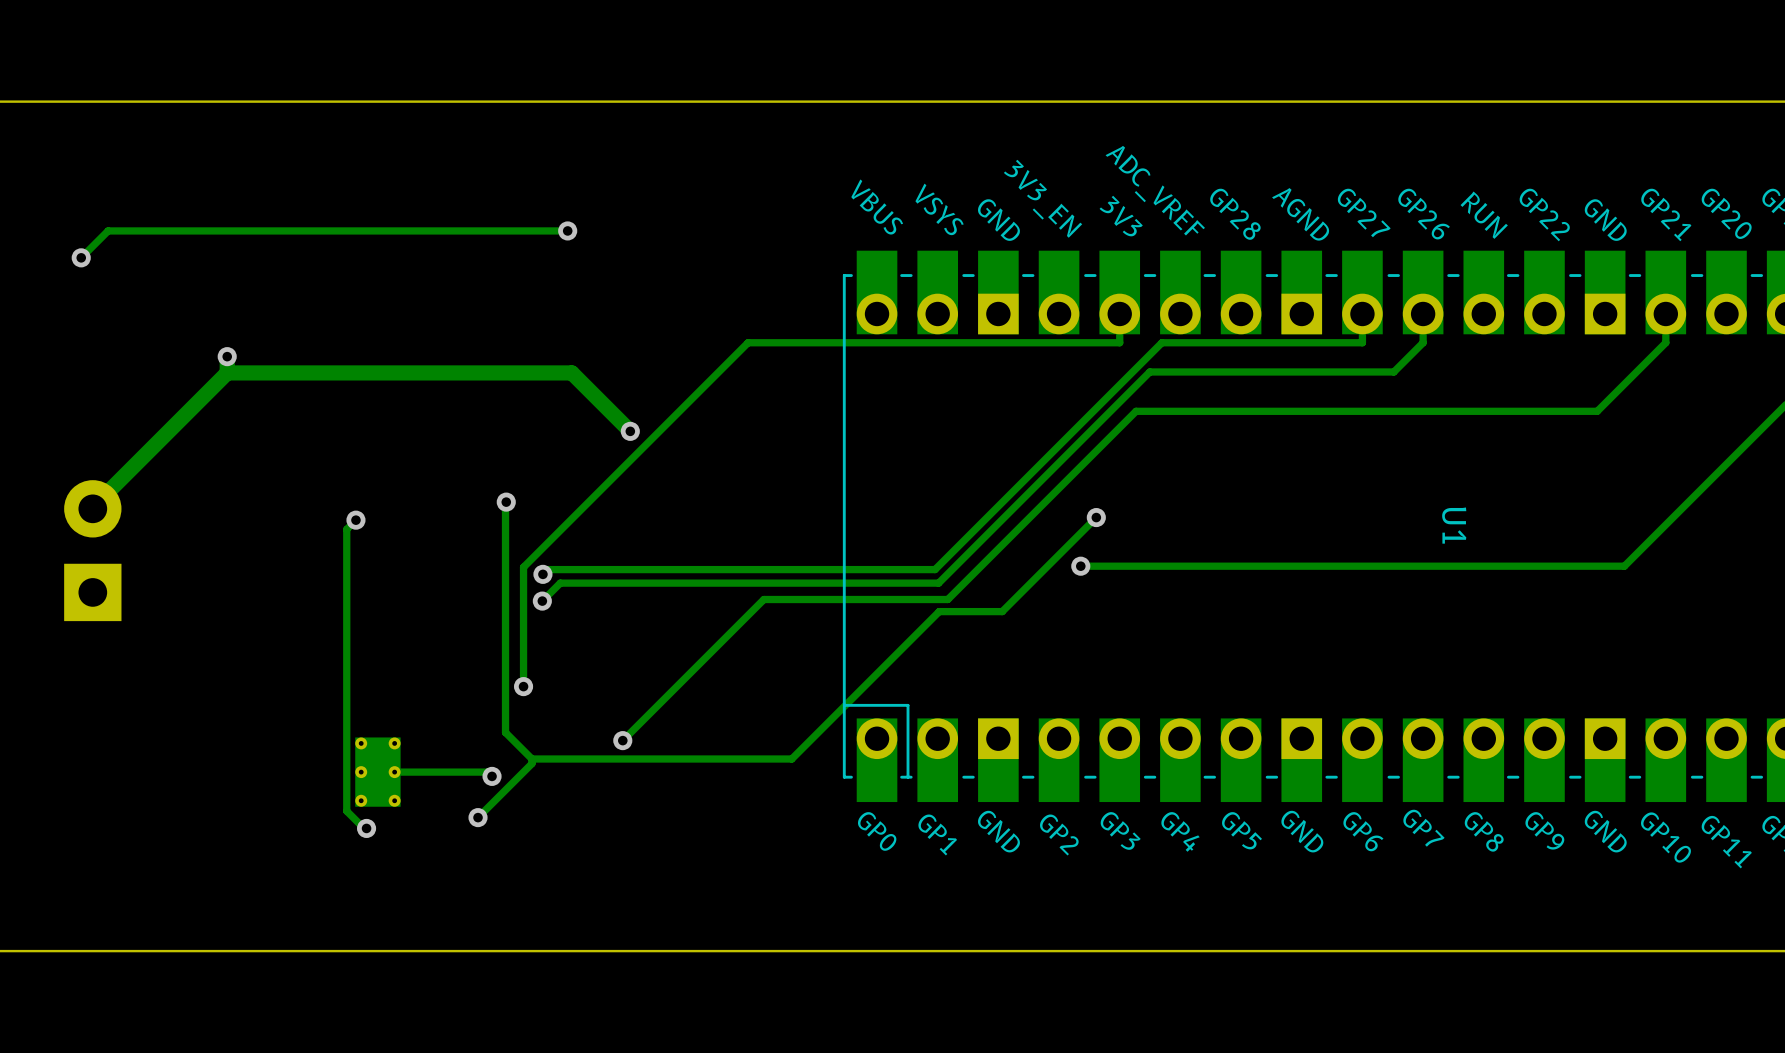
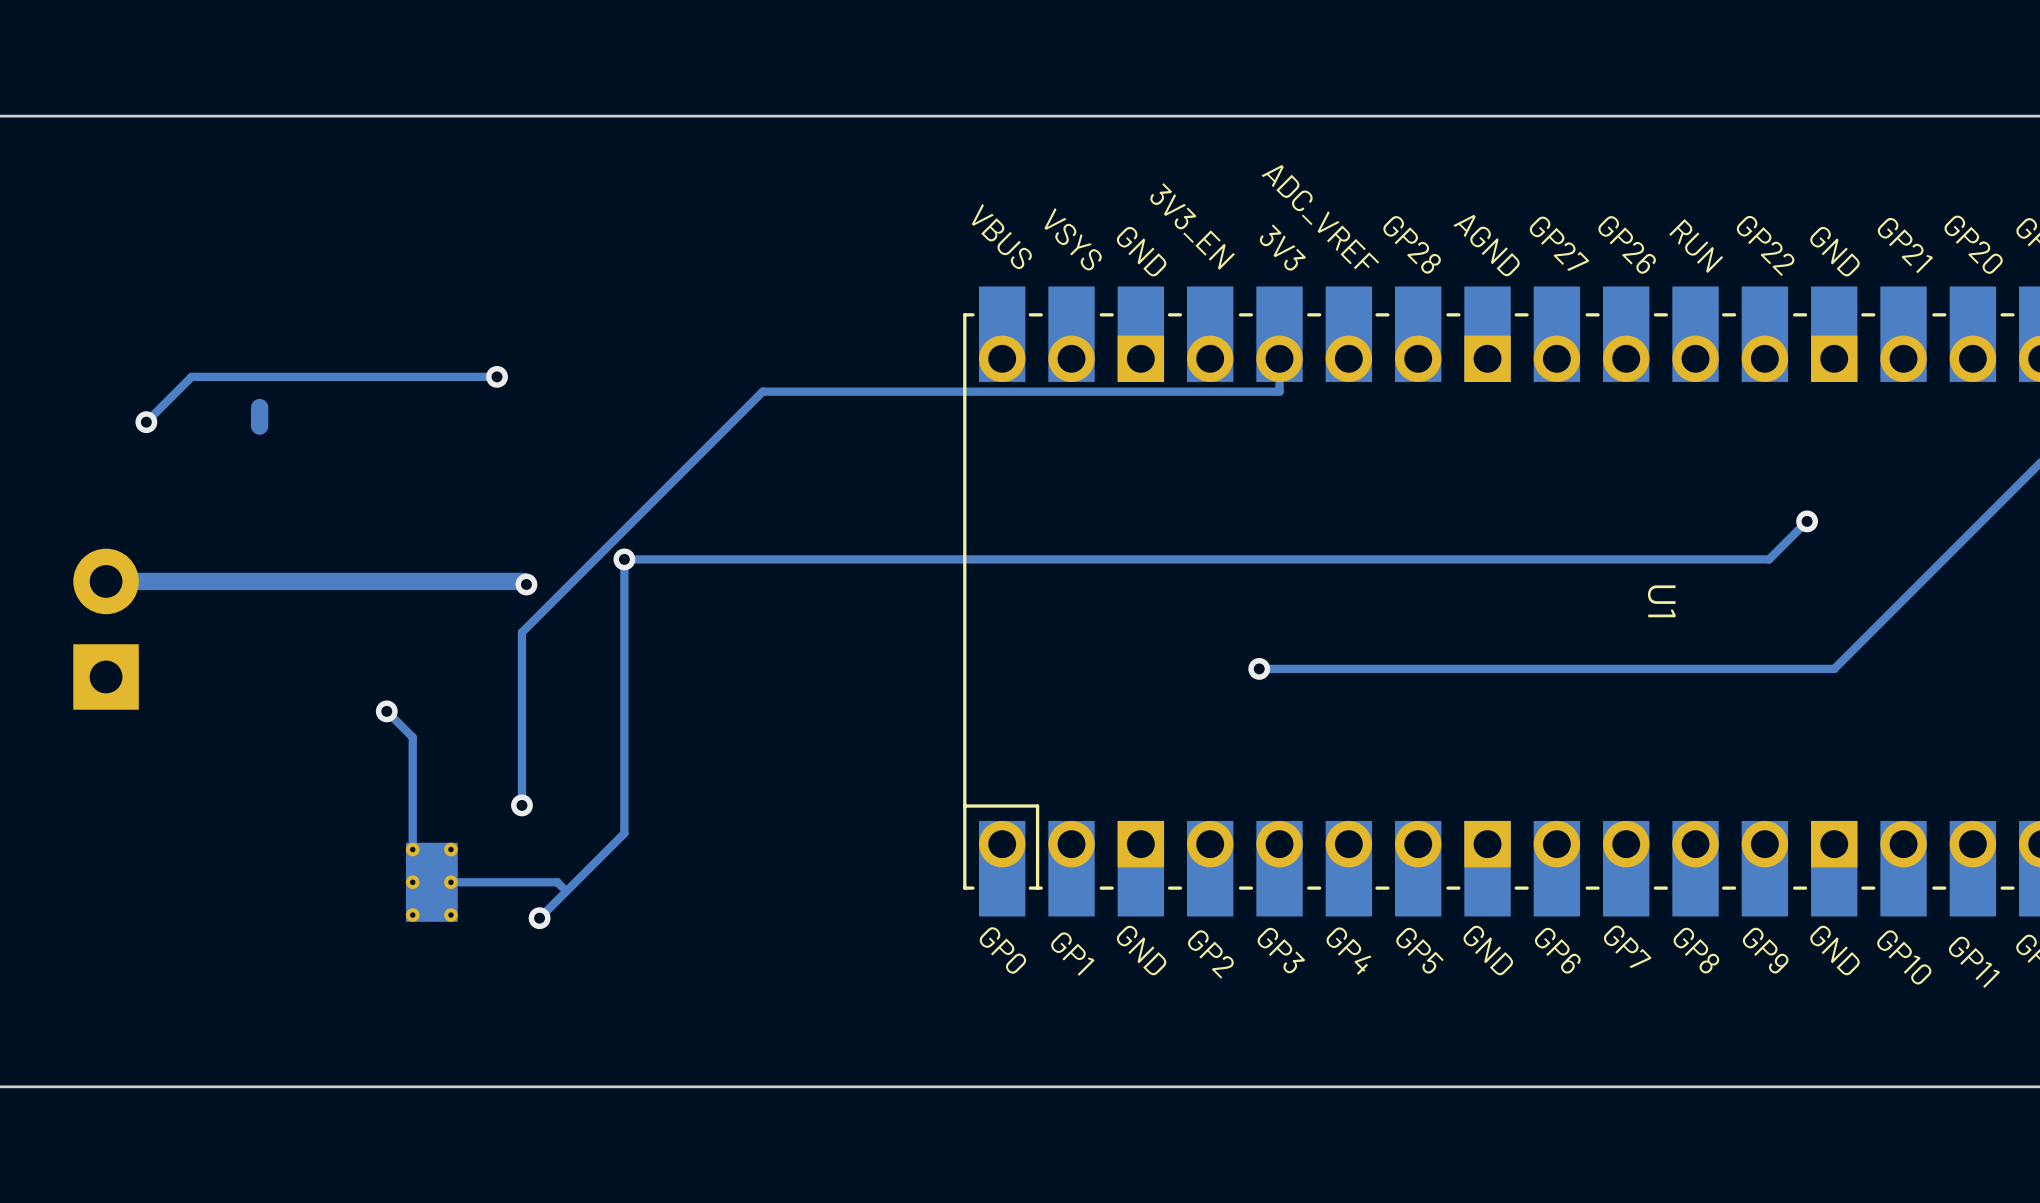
track: (567, 230) (108, 230) (81, 257) -> none
via: (567, 230) -> none
via: (81, 257) -> none
track: (1362, 313) (1362, 342) (1161, 342) (935, 569) (547, 569) (542, 574) -> none
track: (1423, 313) (1423, 342) (1393, 371) (1149, 371) (938, 583) (560, 583) (542, 601) -> none
track: (1665, 313) (1665, 342) (1597, 411) (1136, 411) (947, 599) (763, 599) (622, 740) -> none
track: none -> (497, 376) (191, 376) (146, 422)
via: none -> (497, 376)
track: (748, 342) (523, 567) (523, 686) -> (854, 391) (762, 391) (521, 632) (521, 805)
via: (227, 356) -> none
via: none -> (146, 422)
track: (630, 431) (571, 372) (227, 372) (92, 508) -> (526, 584) (523, 581) (106, 581)
via: (630, 431) -> none
track: none -> (1807, 521) (1769, 559) (624, 559) (624, 833) (539, 918)
via: none -> (1807, 521)
via: none -> (624, 559)
track: (506, 502) (505, 732) (531, 759) -> none
via: (506, 502) -> none
via: none -> (526, 584)
track: (1096, 517) (1002, 611) (939, 611) (791, 759) (531, 759) -> none
via: (1096, 517) -> none
track: (355, 520) (346, 529) (346, 811) (364, 828) (366, 828) -> none
via: (355, 520) -> none
via position: (1080, 566) -> (1259, 668)
track: (1624, 566) (1080, 566) -> (1856, 647) (1834, 668) (1259, 668)
via: (542, 574) -> none
via: (542, 601) -> none
track: none -> (386, 711) (412, 737) (412, 849)
via: none -> (386, 711)
via: (523, 686) -> none
via: none -> (521, 805)
via: (622, 740) -> none
track: (531, 759) (531, 763) (478, 817) -> none
via: (492, 776) -> none
via position: (478, 817) -> (539, 918)
via: (366, 828) -> none

